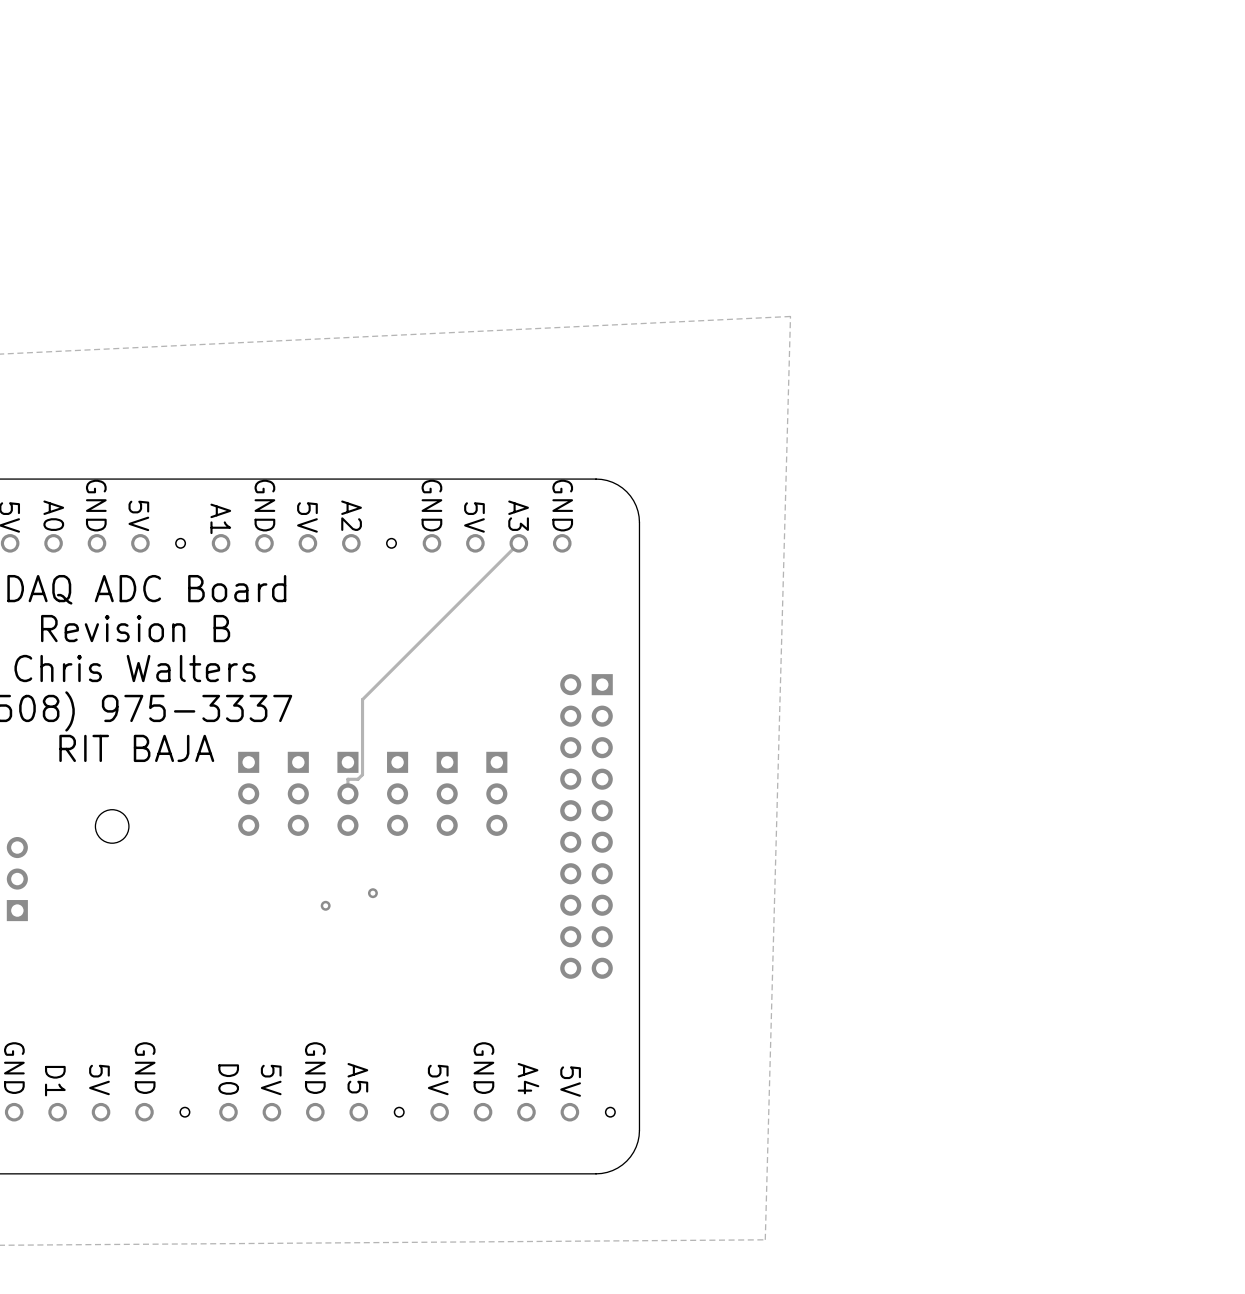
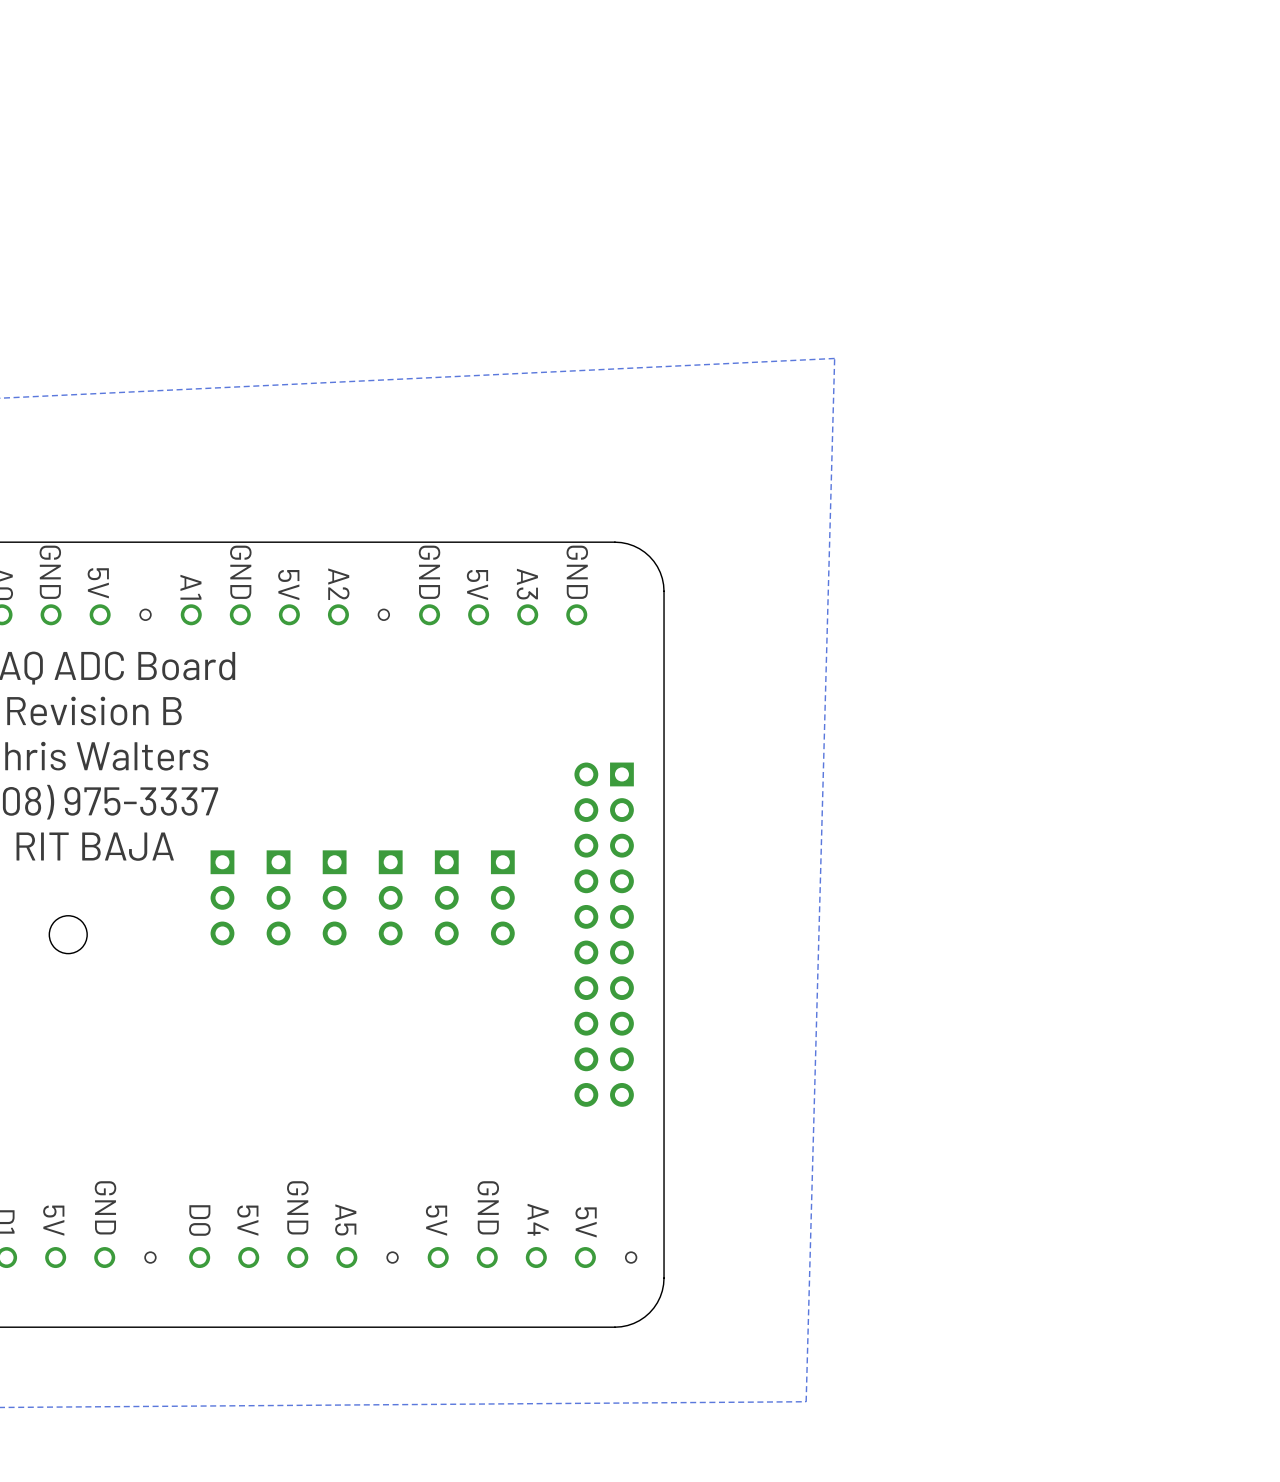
track: (518, 543) (362, 699) (362, 774) (357, 779) (347, 779) (347, 793) -> none
via: (372, 893) -> none
via: (325, 905) -> none

